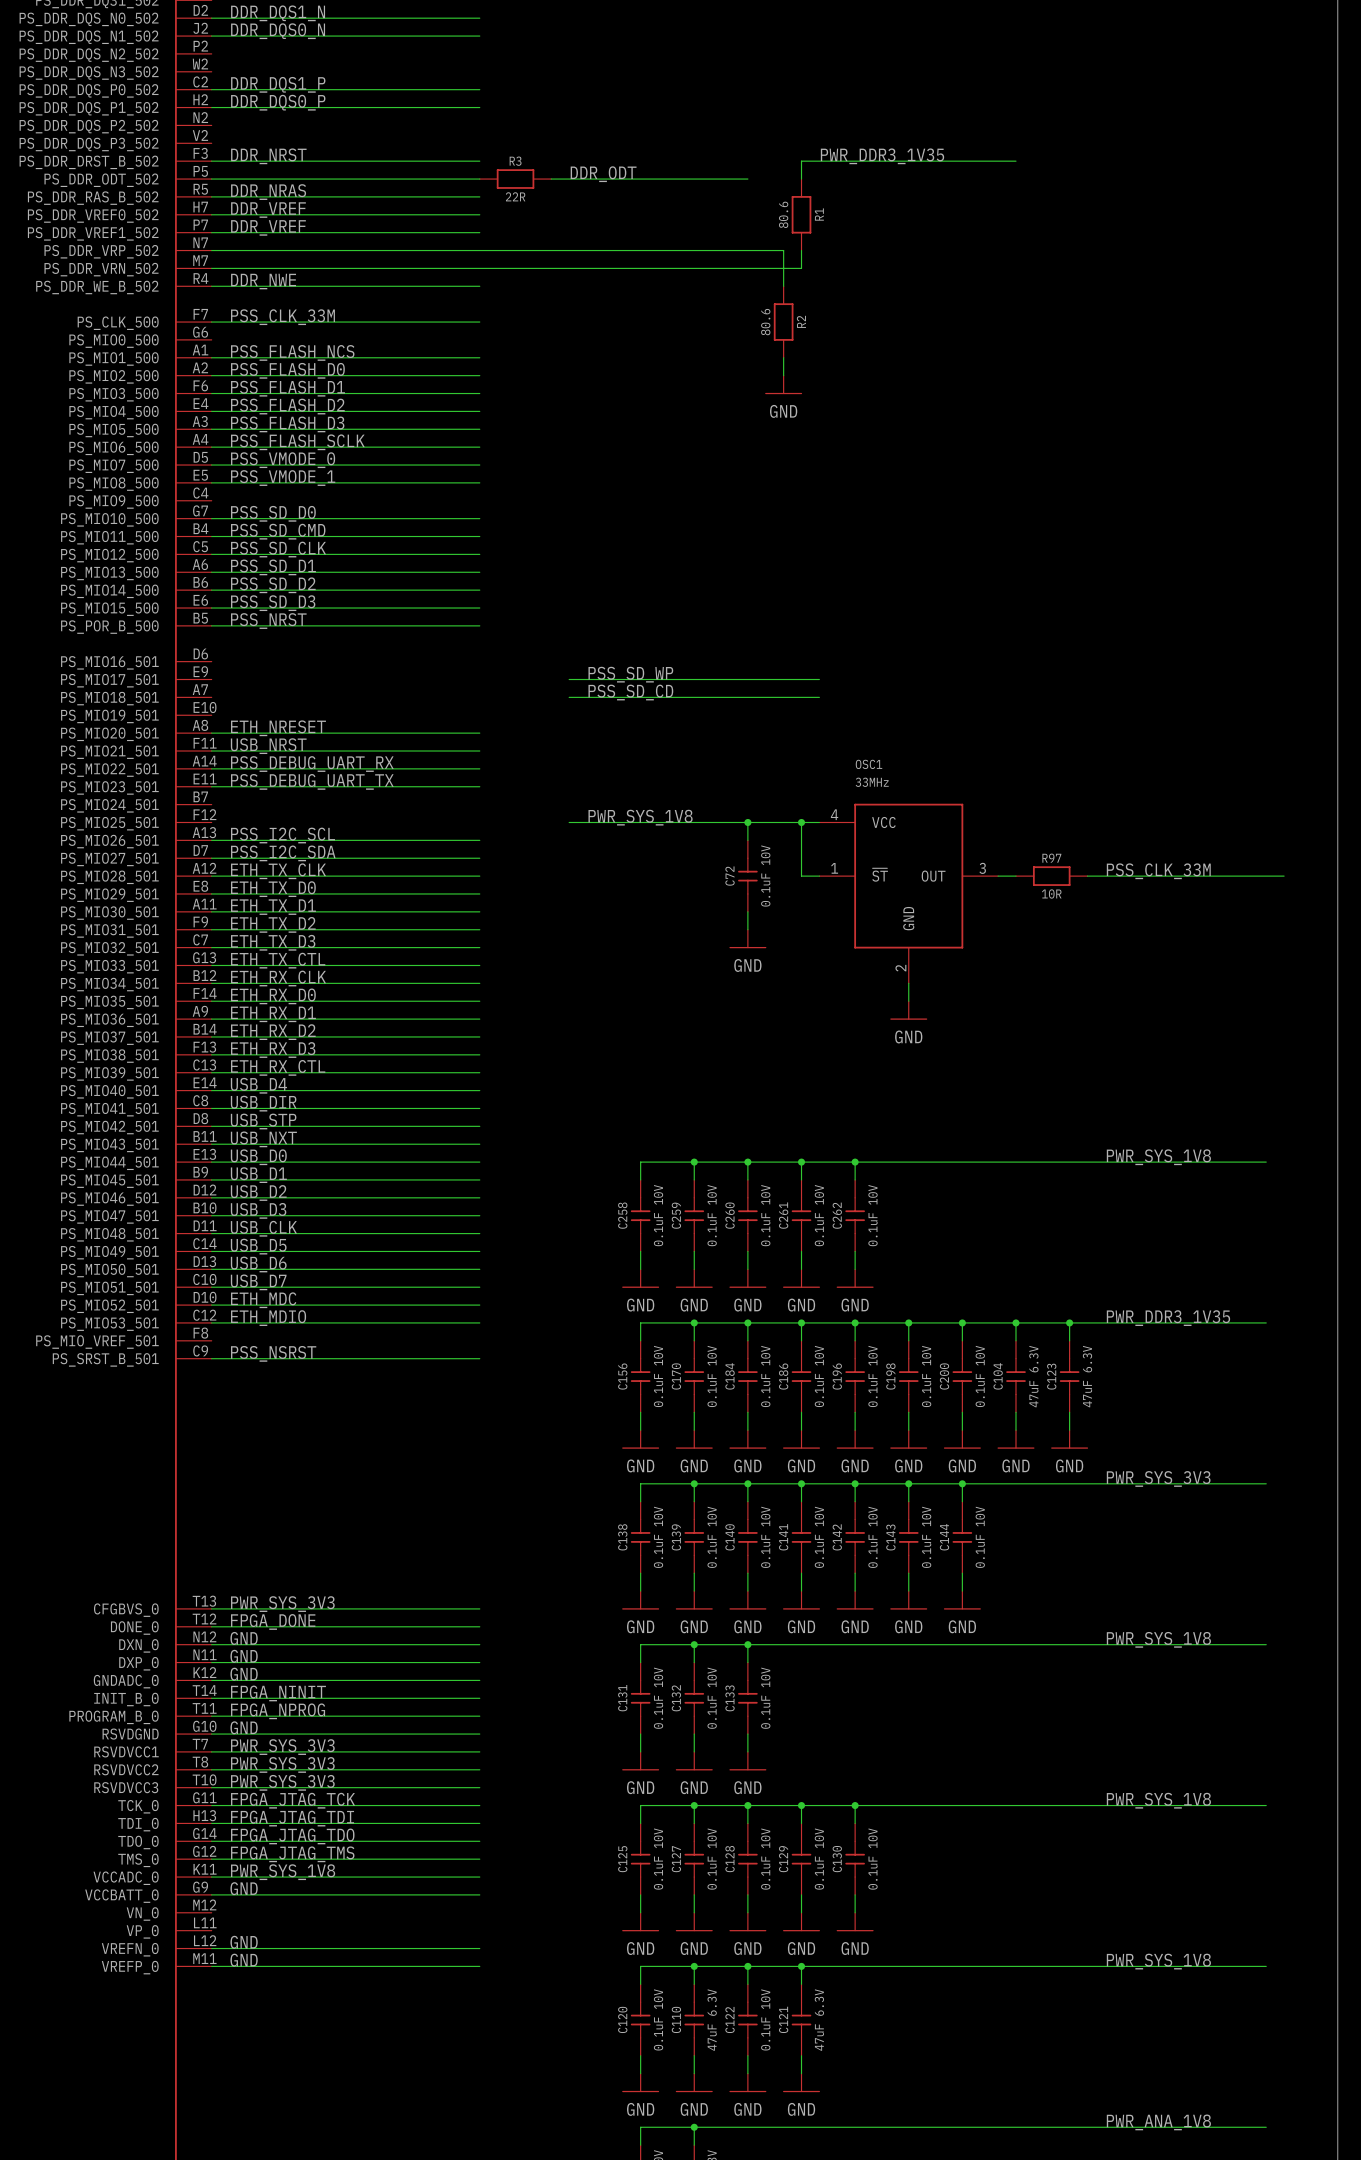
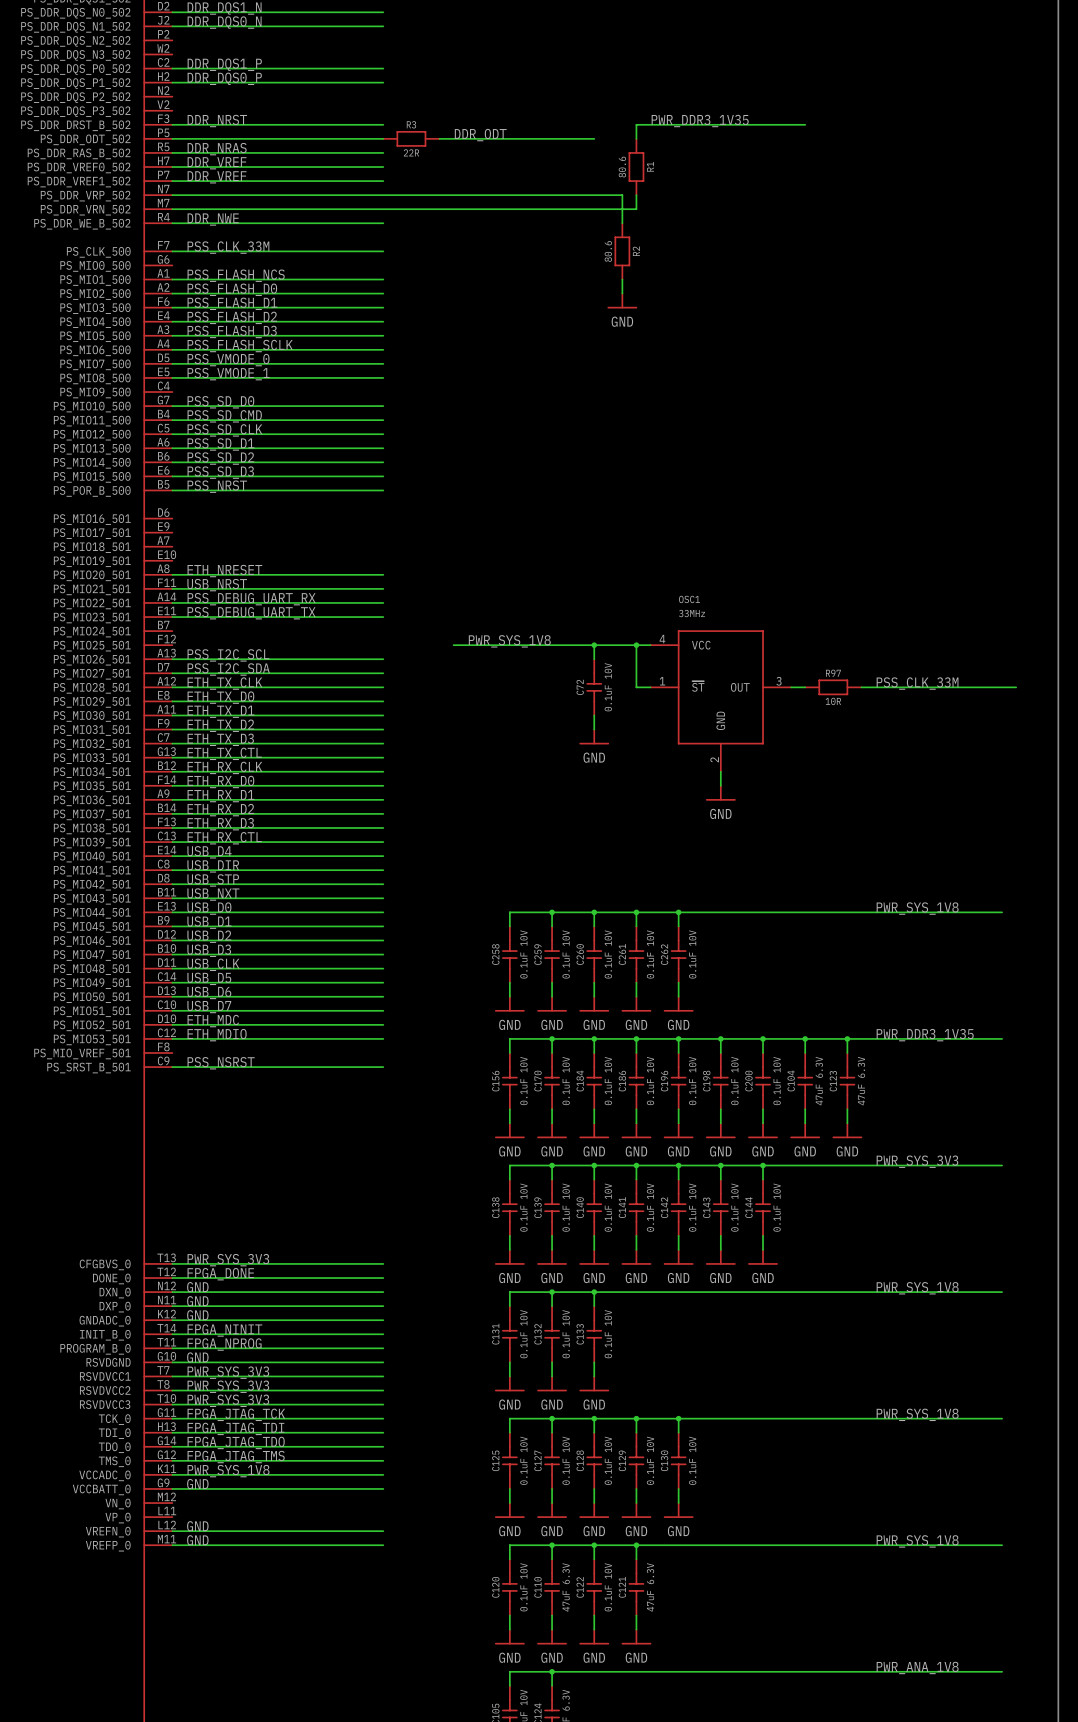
label: PSS_SD_WP (630, 674) -> none
wire: (569, 679) (819, 679) -> none
label: PSS_SD_CD (630, 692) -> none
wire: (569, 697) (819, 697) -> none

